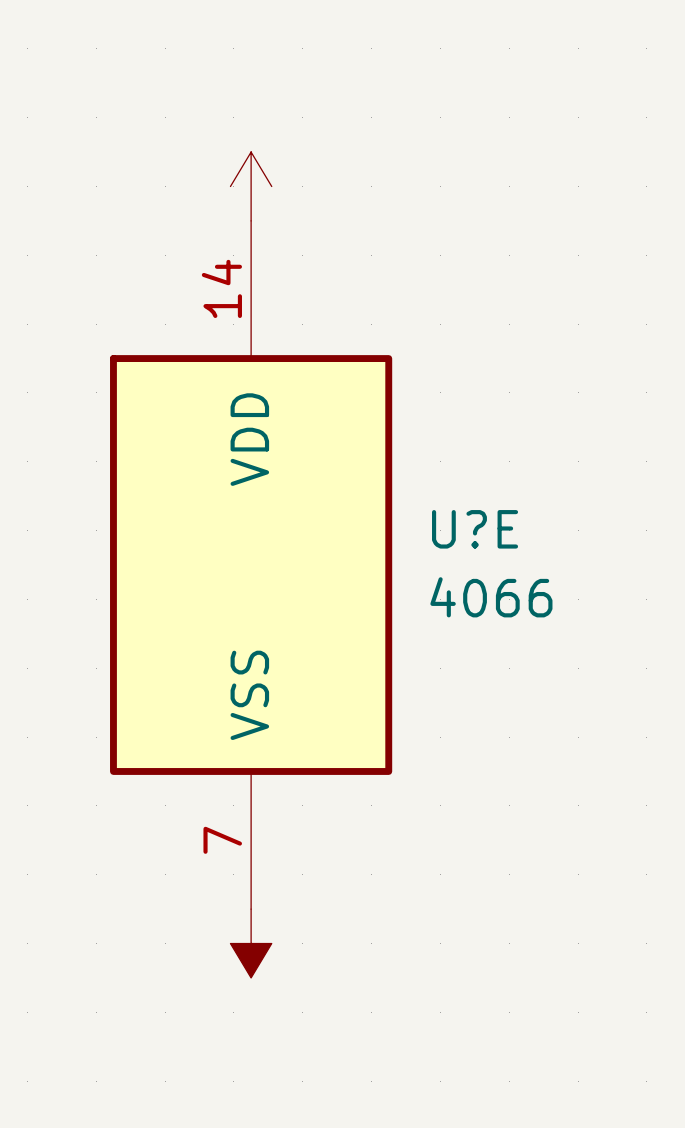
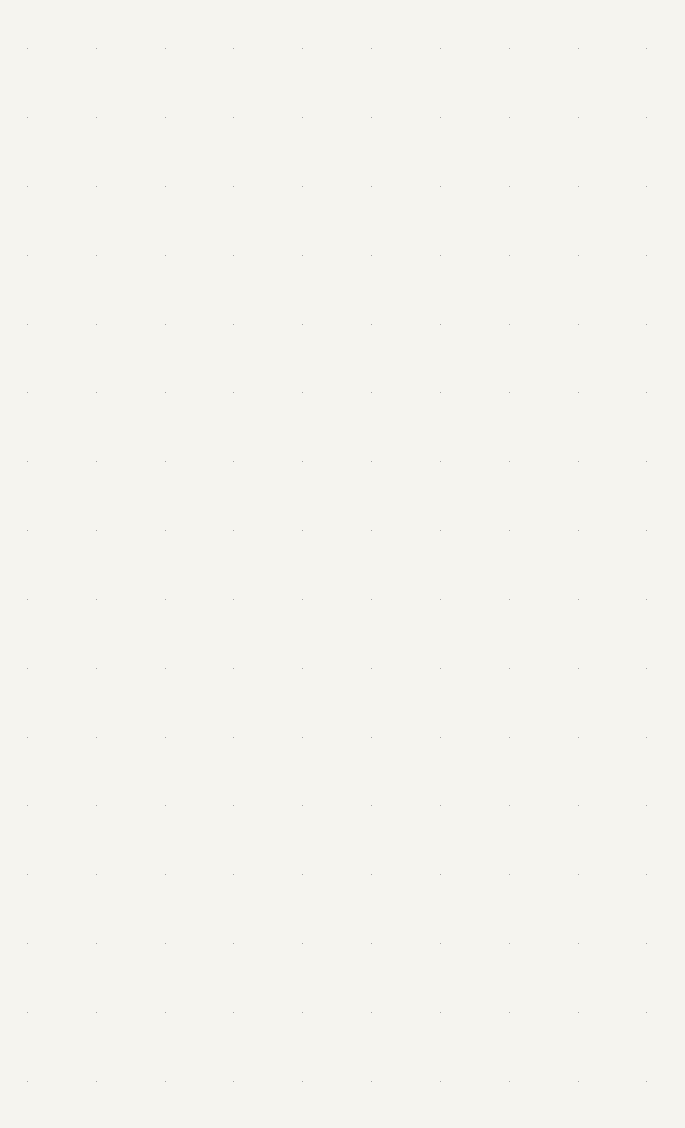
power symbol: (251, 186) -> none
U?E: 4066 (251, 565) -> none
power symbol: (251, 943) -> none

